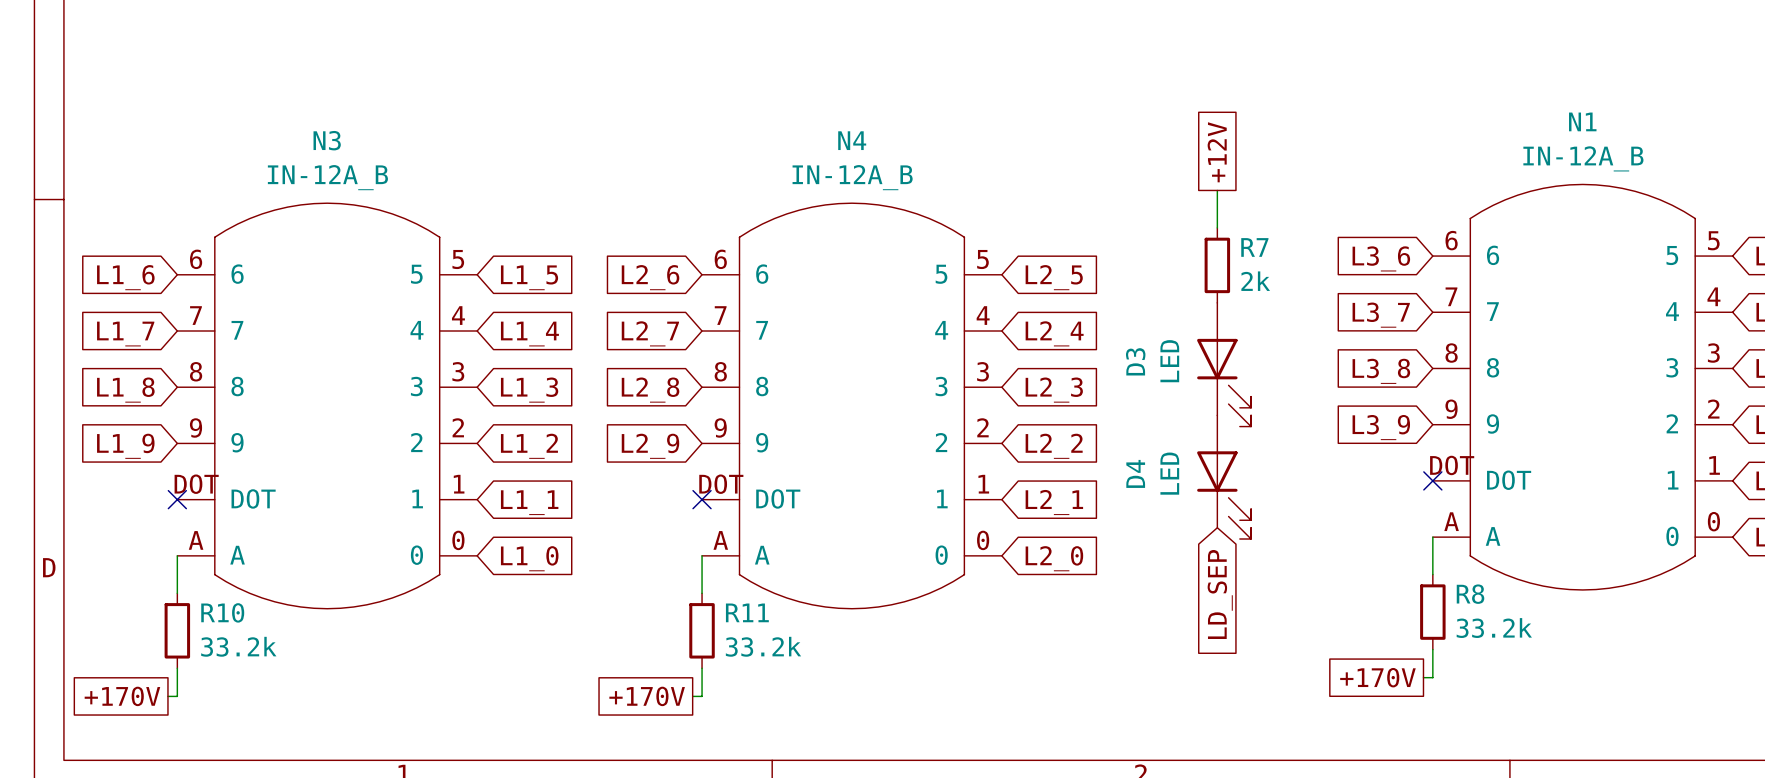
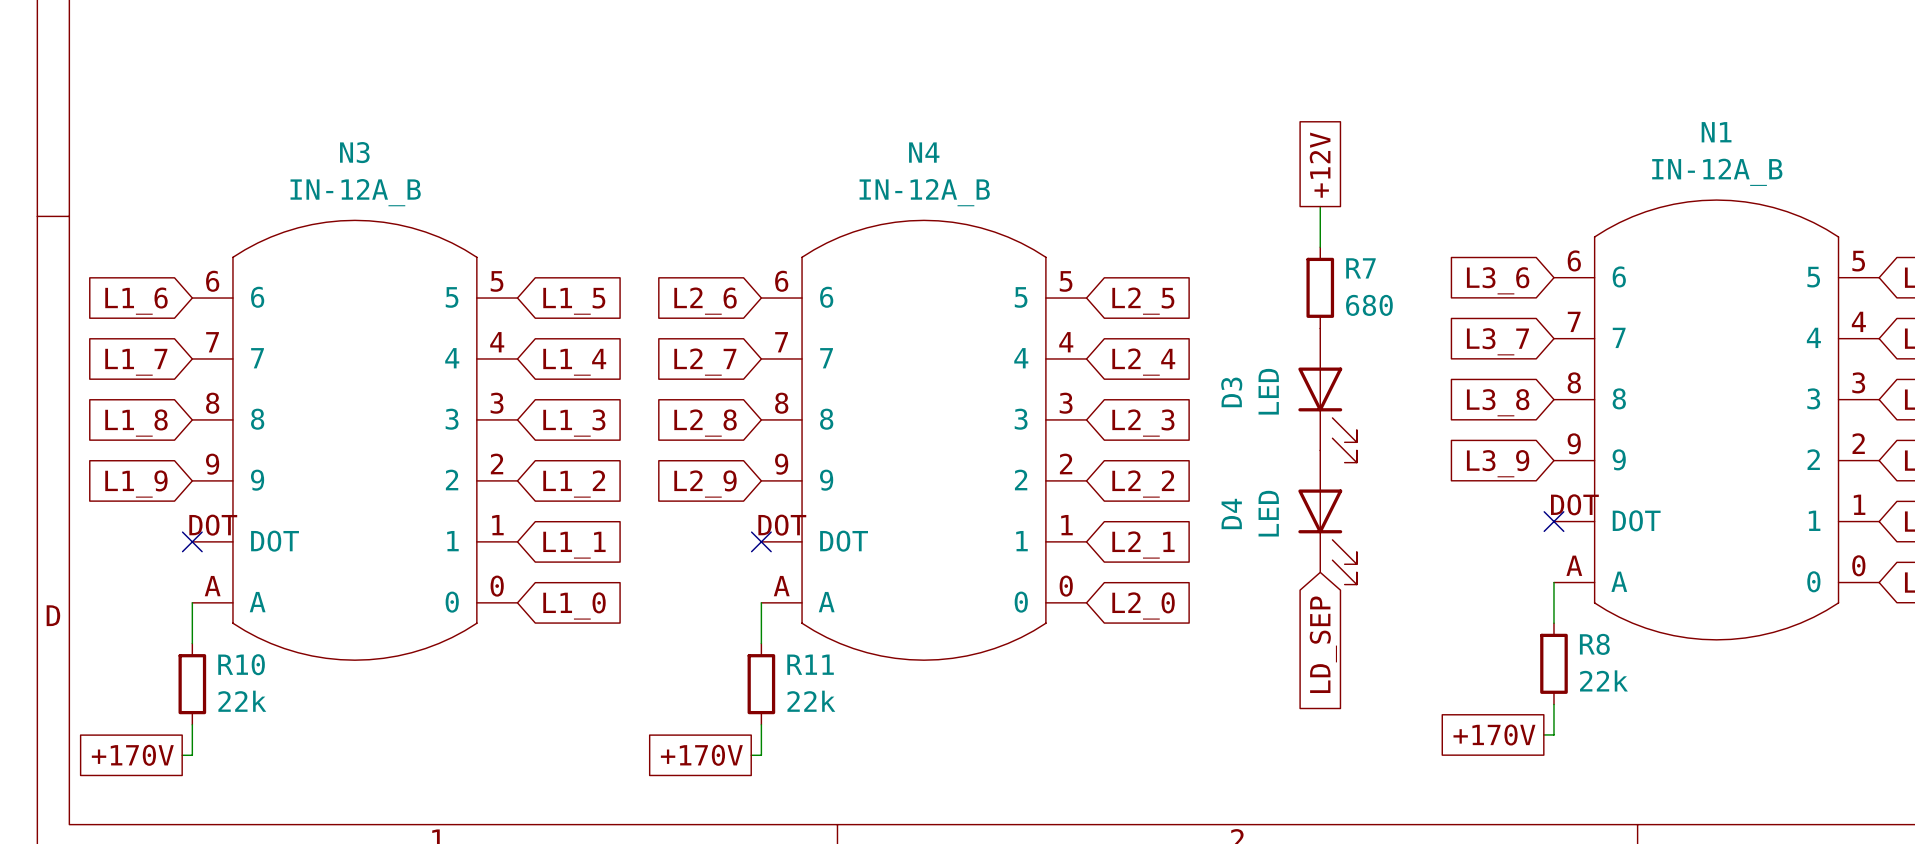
R7 value: 2k (1255, 281) -> 680 (1369, 305)
R8 value: 33.2k (1494, 628) -> 22k (1603, 680)
R10 value: 33.2k (238, 646) -> 22k (242, 701)
R11 value: 33.2k (763, 646) -> 22k (811, 701)

